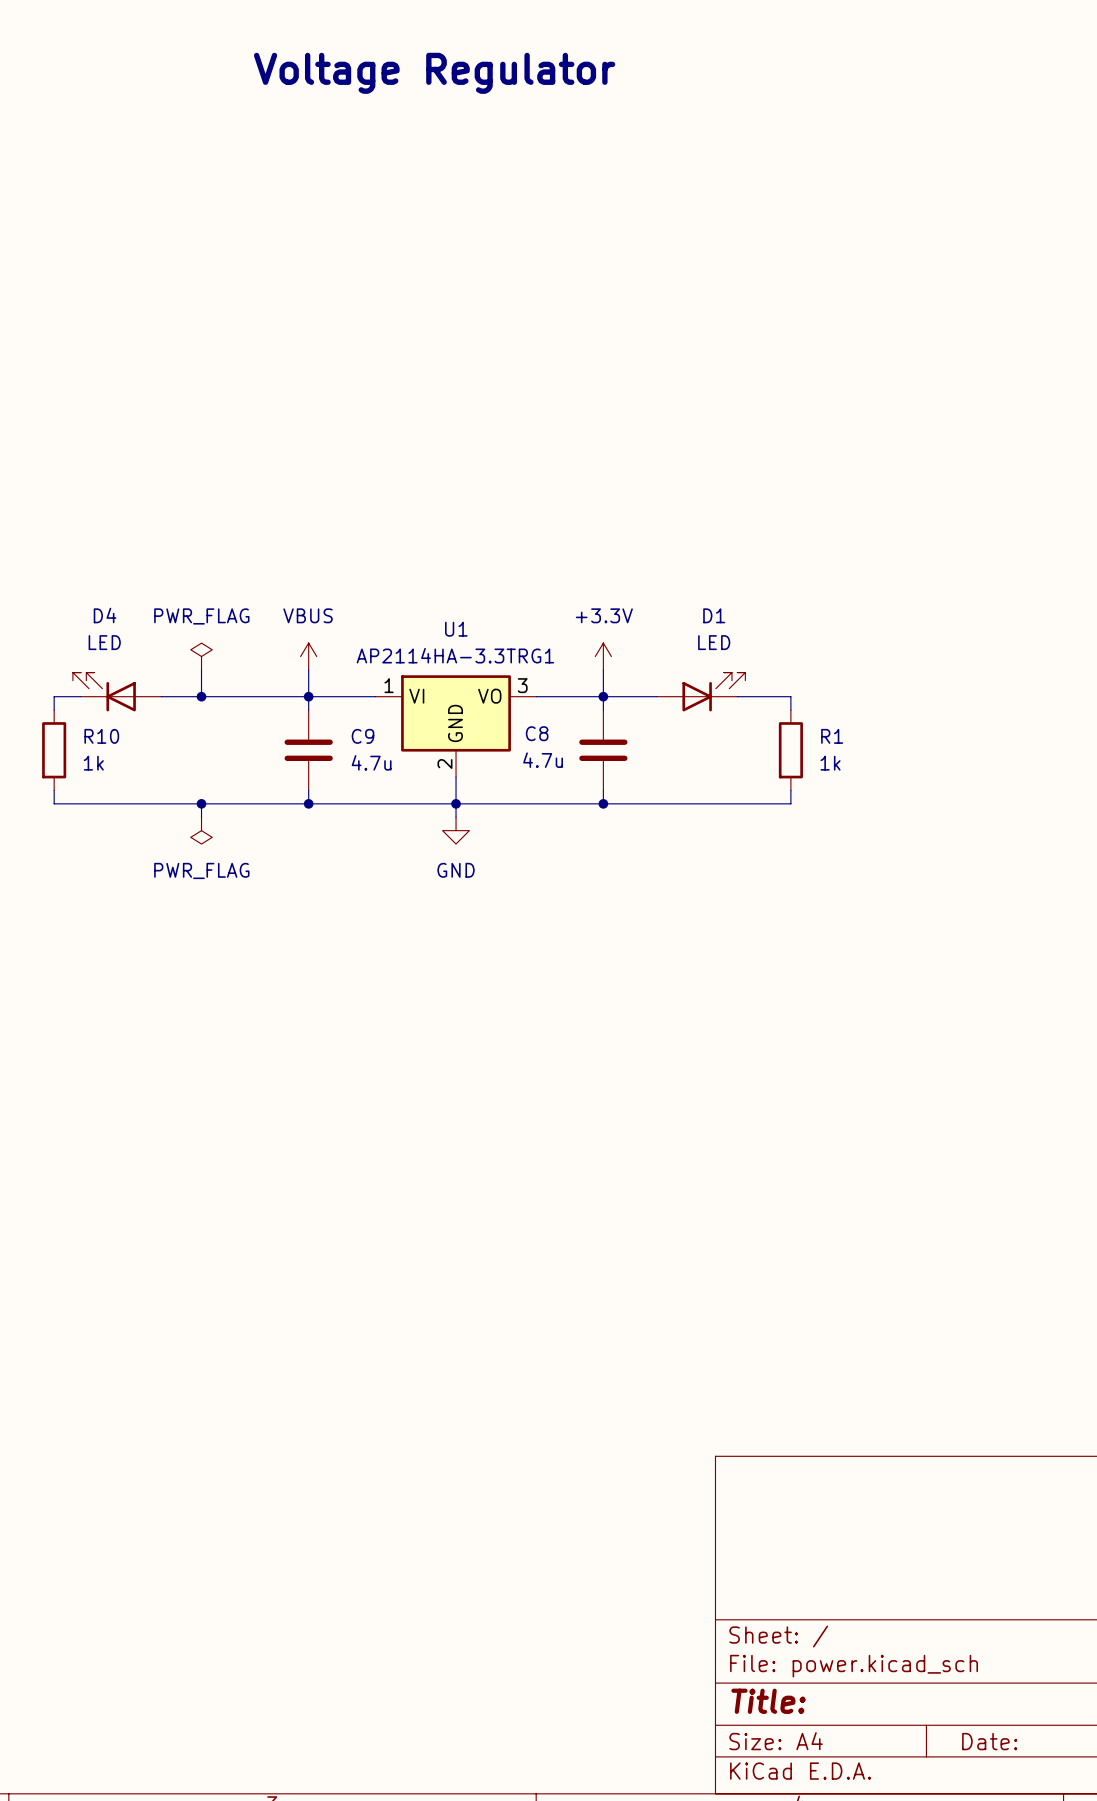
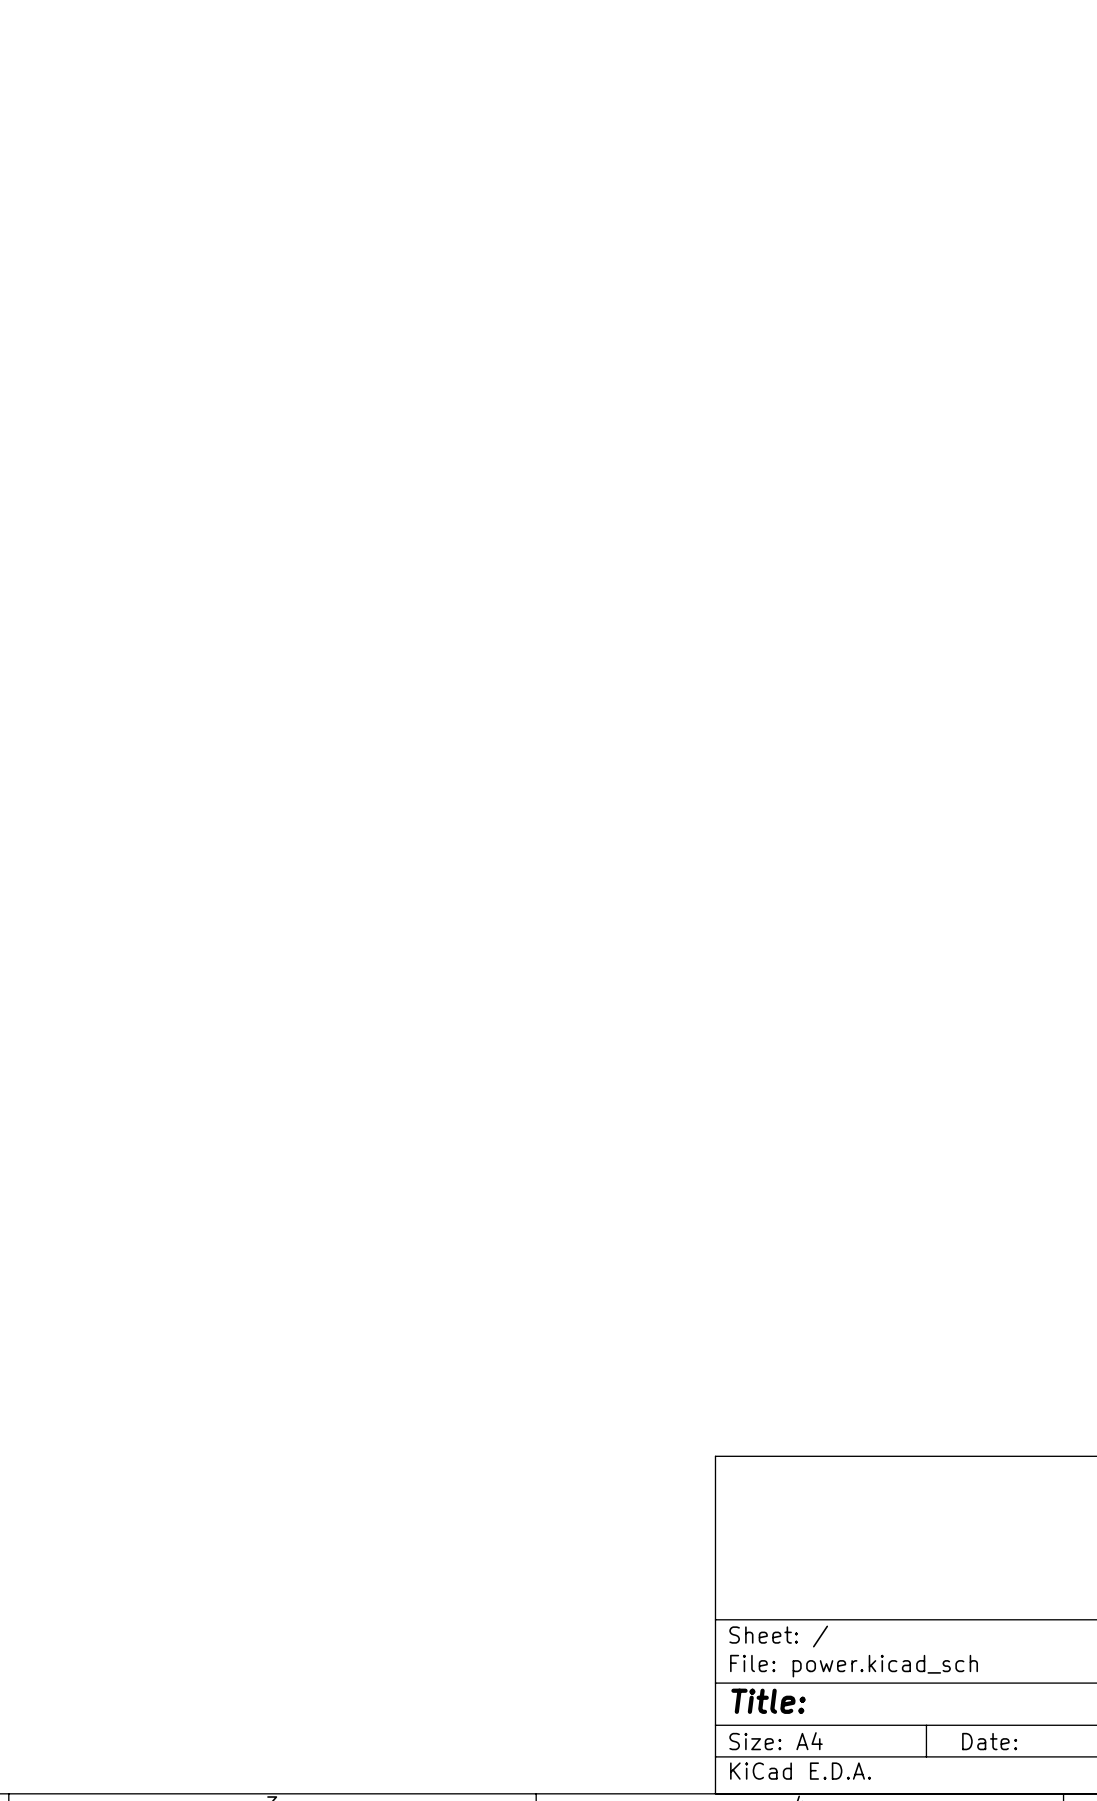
text: Voltage Regulator (434, 73) -> none
power symbol: PWR_FLAG (201, 656) -> none
power symbol: VBUS (308, 656) -> none
power symbol: +3.3V (603, 656) -> none
wire: (201, 669) (201, 696) -> none
wire: (308, 669) (308, 710) -> none
wire: (603, 669) (603, 710) -> none
D4: LED (117, 692) -> none
D1: LED (701, 692) -> none
wire: (80, 696) (54, 696) (54, 710) -> none
wire: (161, 696) (375, 696) -> none
junction: (201, 696) -> none
junction: (308, 696) -> none
wire: (536, 696) (656, 696) -> none
junction: (603, 696) -> none
wire: (737, 696) (790, 696) (790, 710) -> none
U1: AP2114HA-3.3TRG1 (456, 726) -> none
R10: 1k (54, 750) -> none
C9: 4.7u (308, 750) -> none
C8: 4.7u (603, 750) -> none
R1: 1k (790, 750) -> none
wire: (456, 777) (456, 817) -> none
wire: (54, 790) (54, 803) (790, 803) (790, 790) -> none
wire: (308, 790) (308, 803) -> none
wire: (603, 790) (603, 803) -> none
wire: (201, 803) (201, 817) -> none
junction: (201, 803) -> none
junction: (308, 803) -> none
junction: (456, 803) -> none
junction: (603, 803) -> none
power symbol: PWR_FLAG (201, 830) -> none
power symbol: GND (456, 830) -> none

